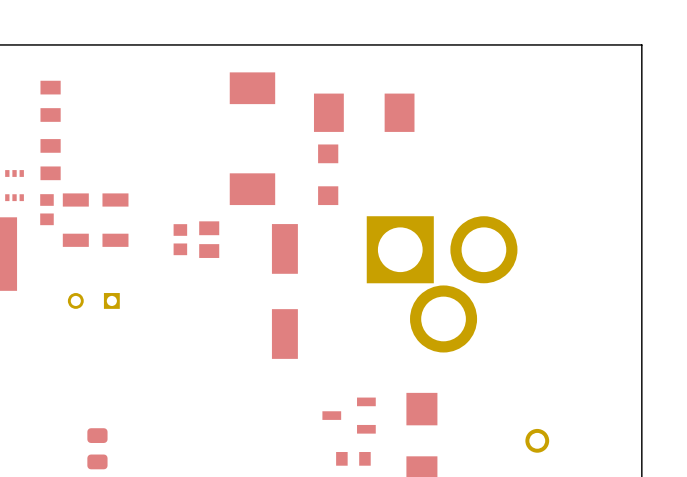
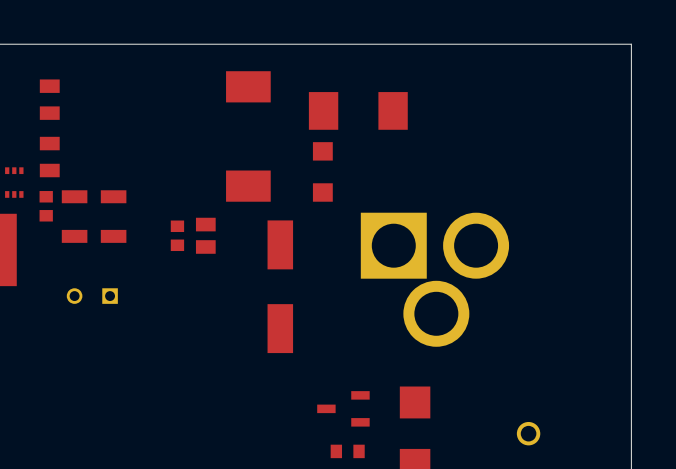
part: (97, 448) -> none

